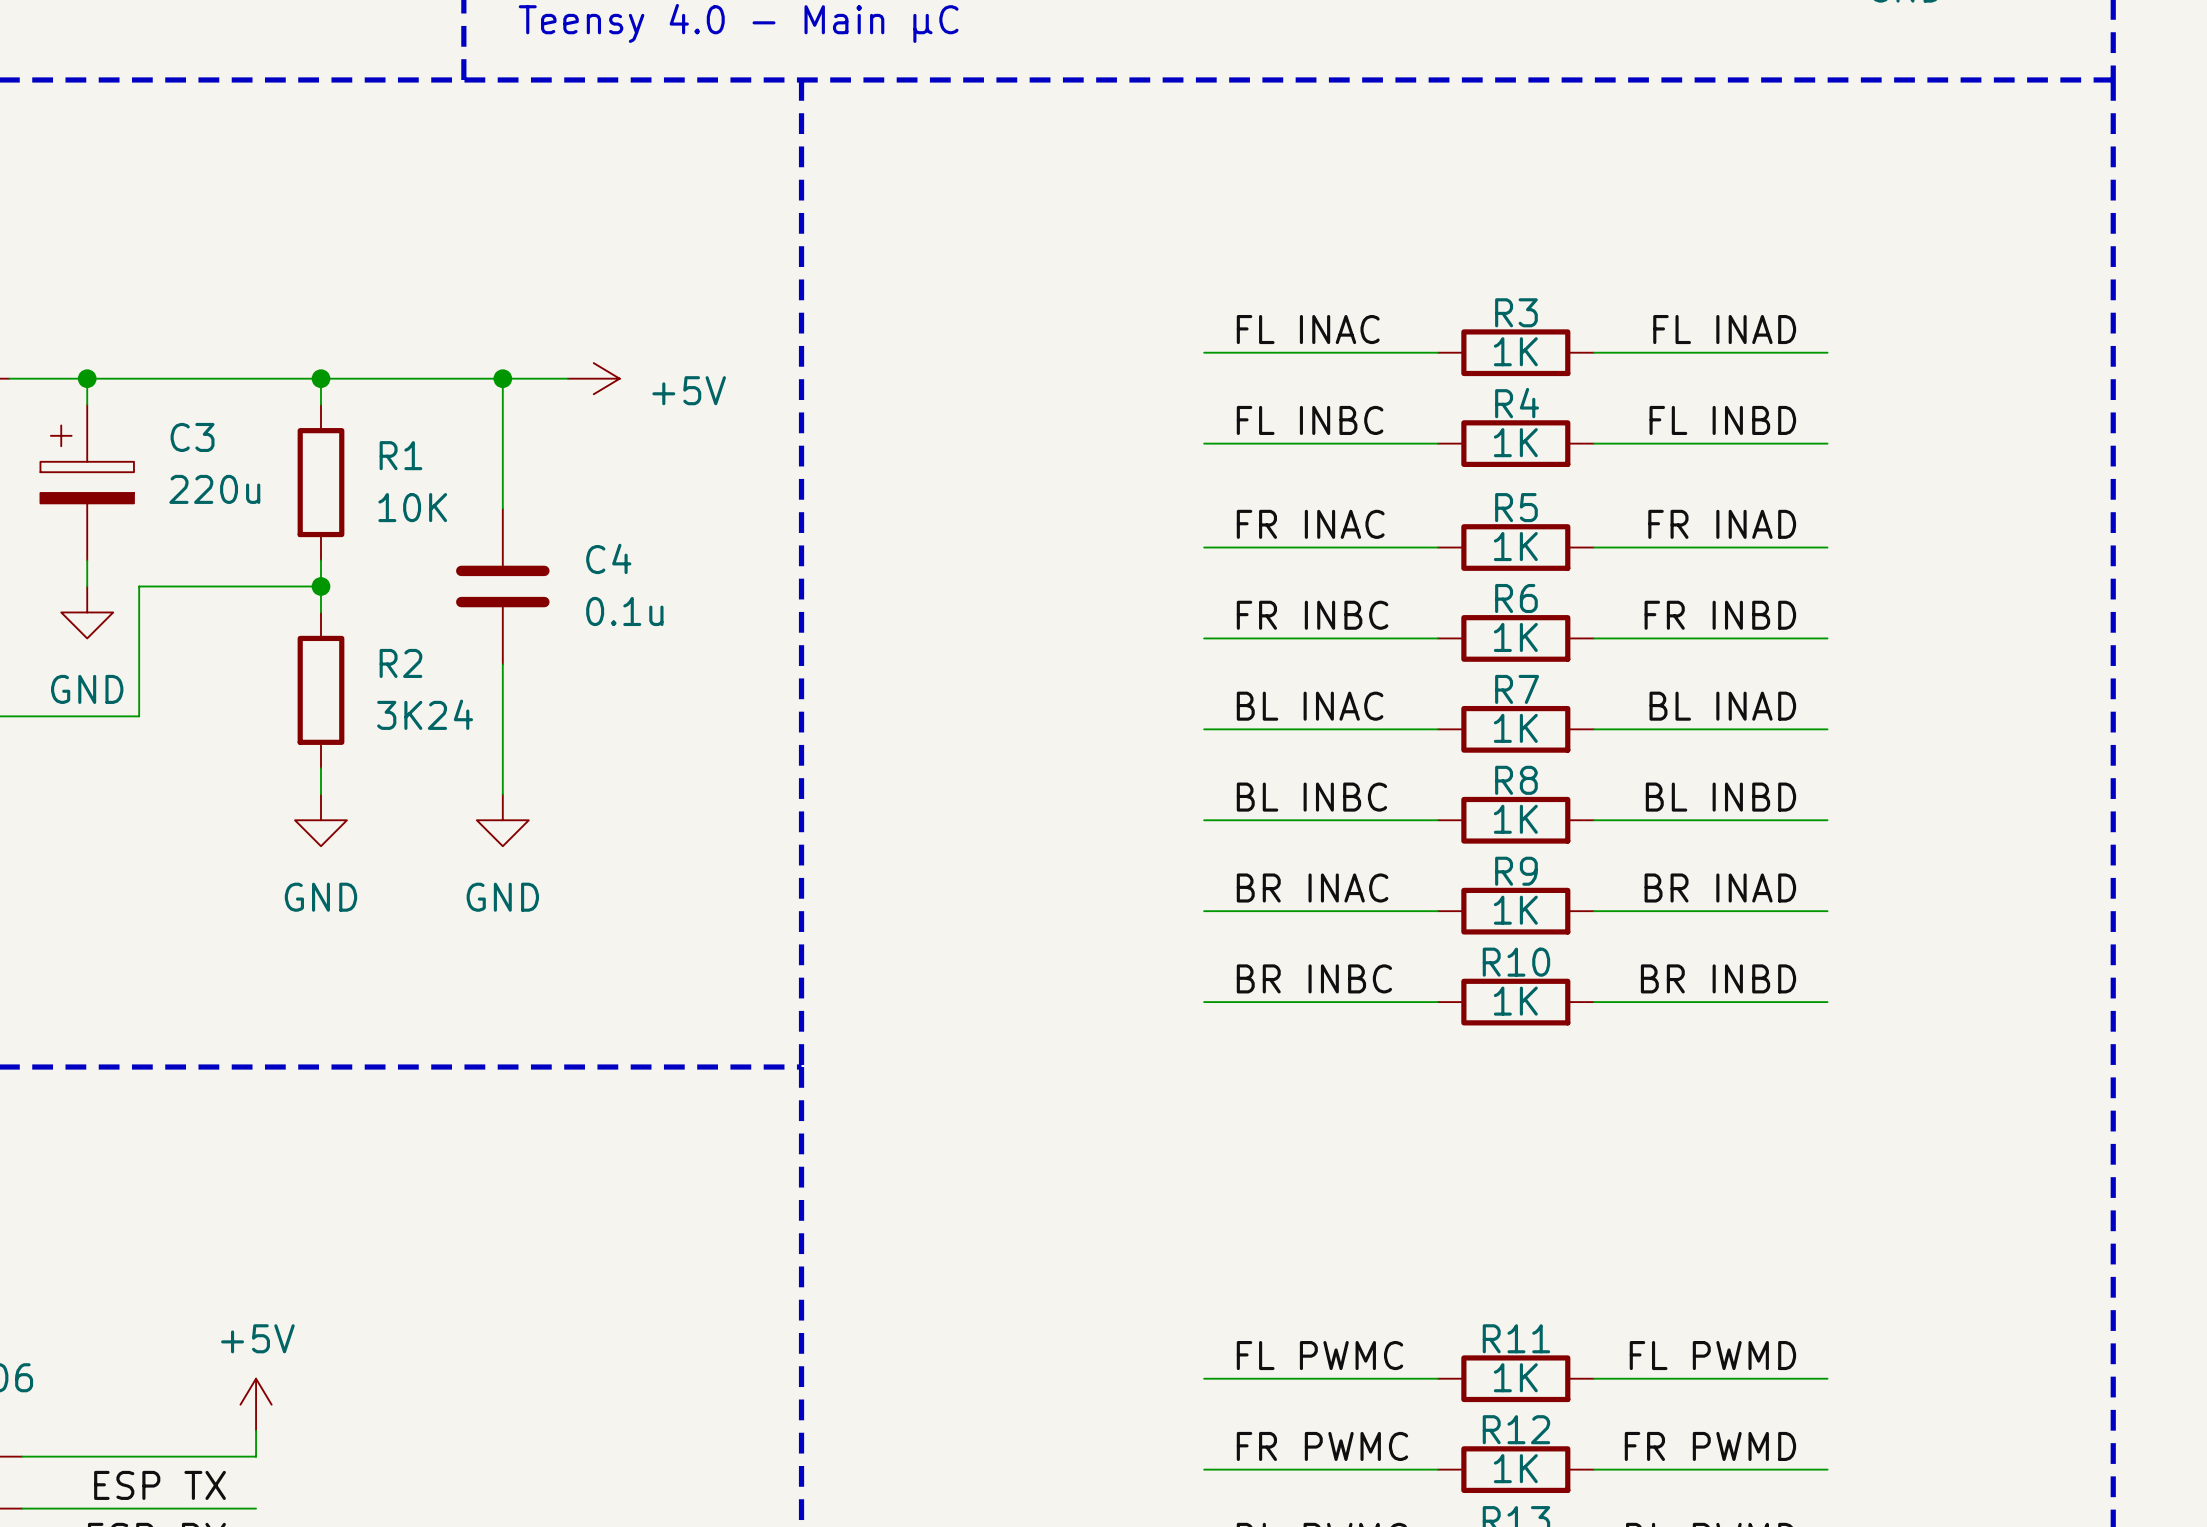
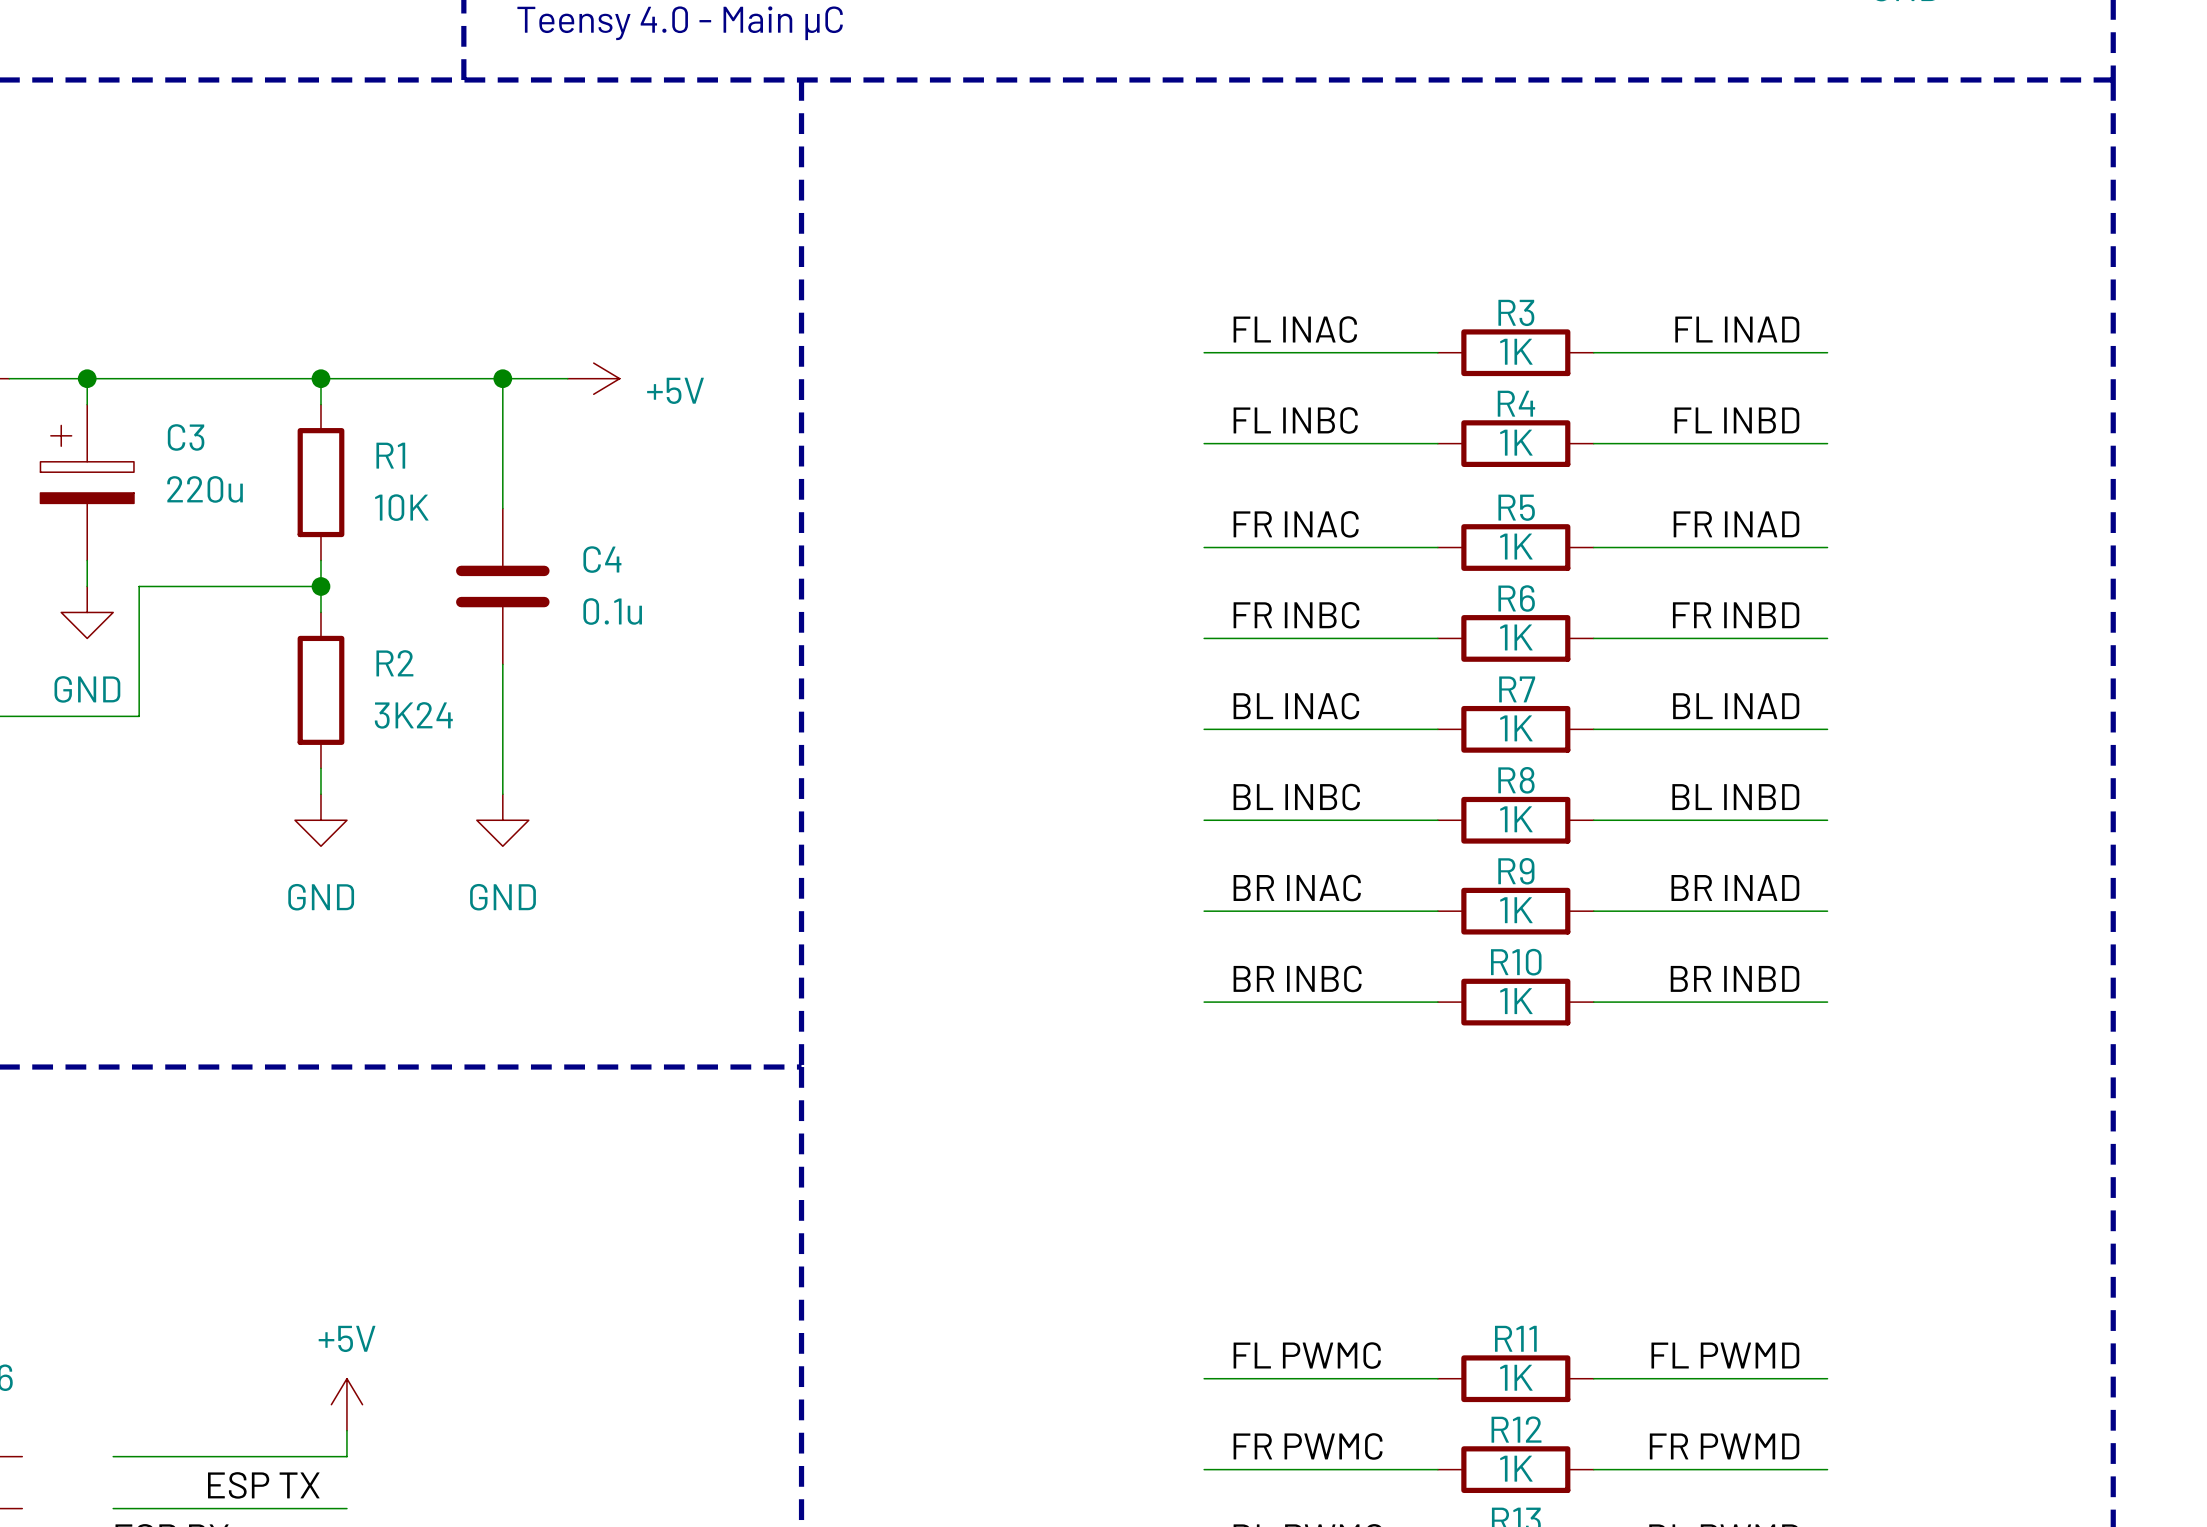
power symbol position: +5V (256, 1404) -> +5V (346, 1404)
wire: (256, 1430) (256, 1456) -> (346, 1430) (346, 1456) (256, 1456)
wire: (22, 1456) (113, 1456) -> none
label position: ESP TX (160, 1485) -> ESP TX (263, 1485)
wire: (22, 1508) (113, 1508) -> (256, 1508) (346, 1508)

